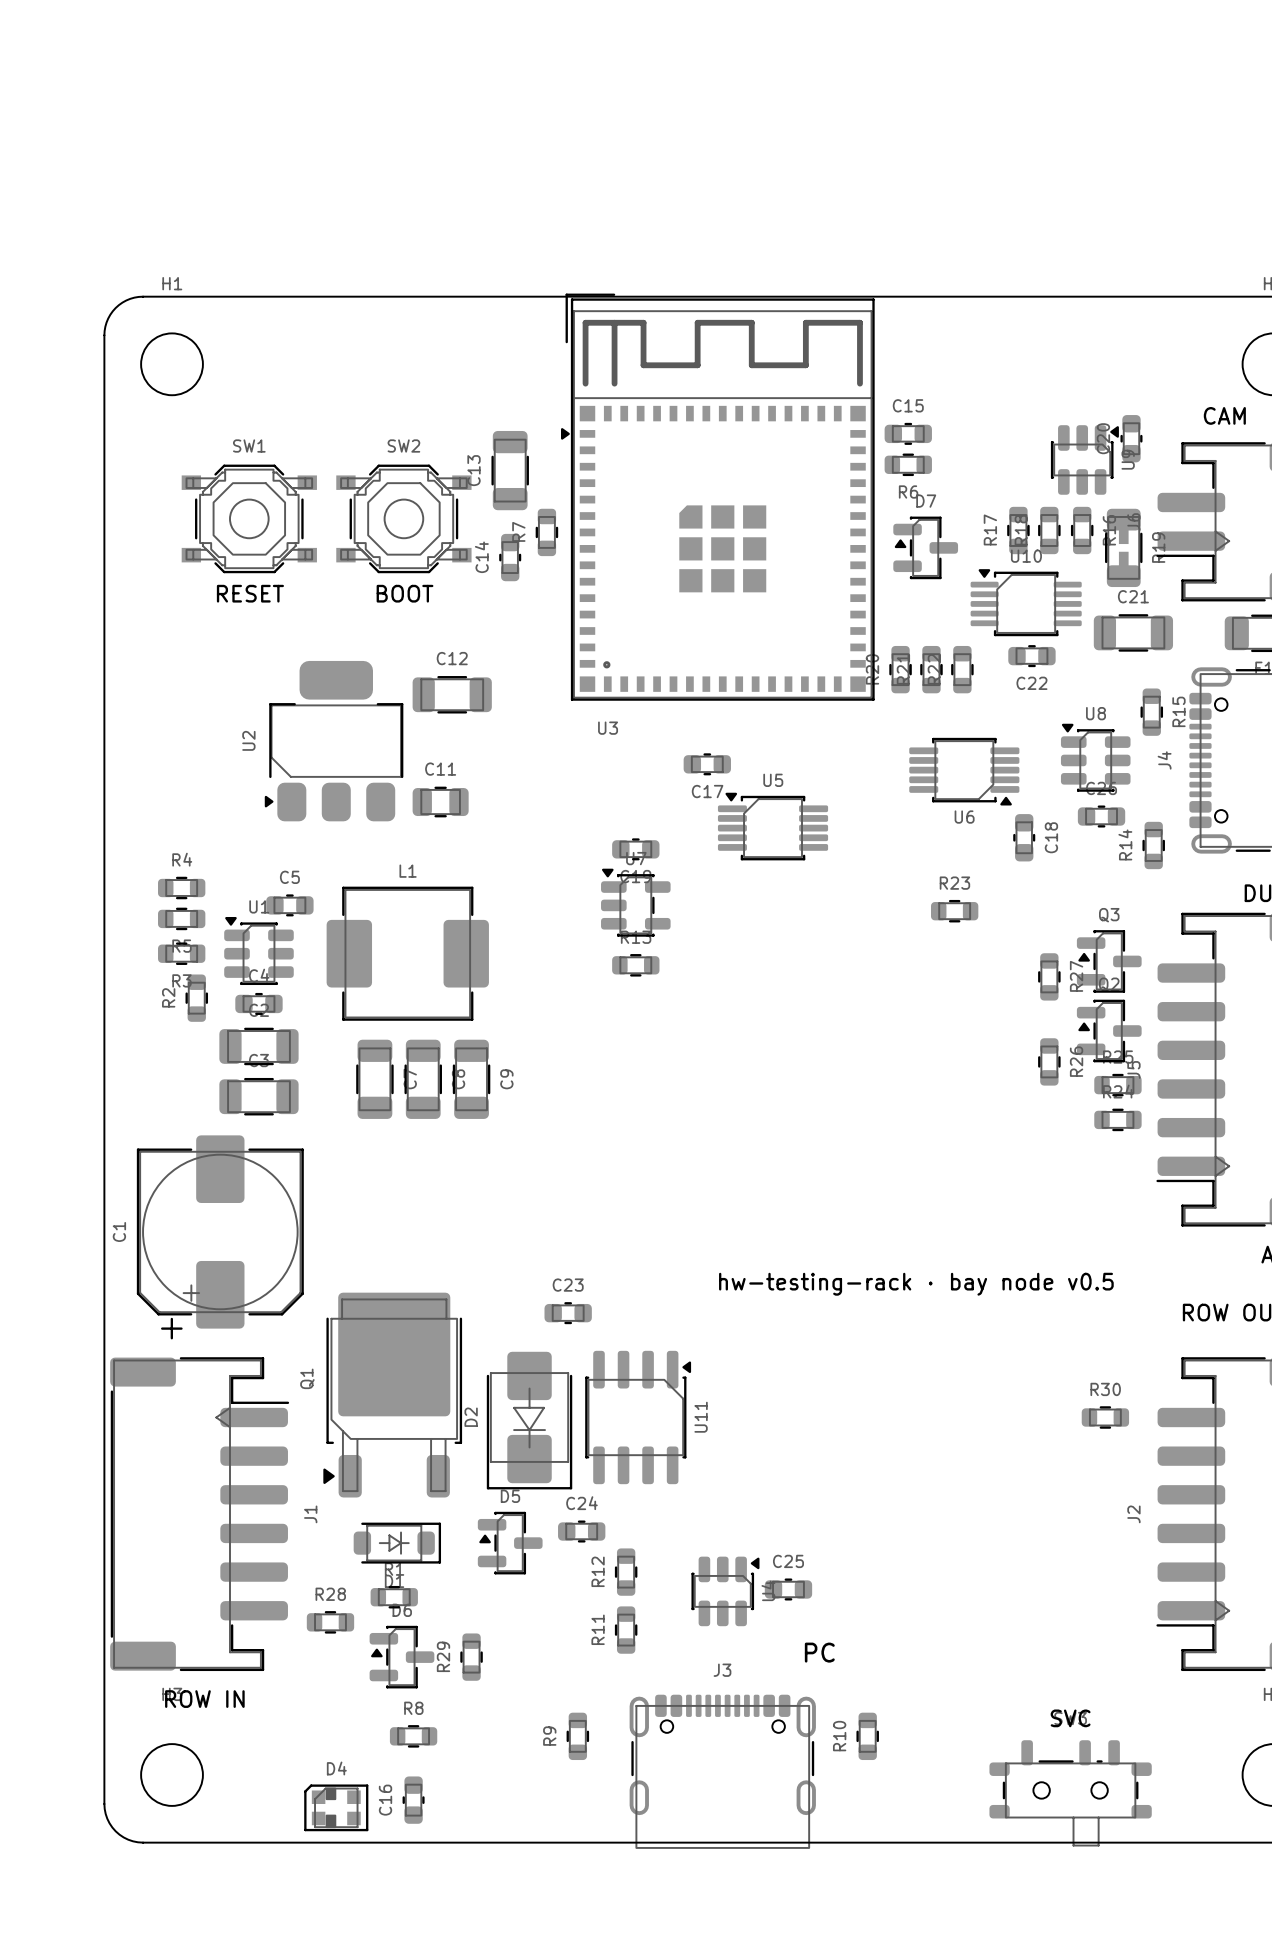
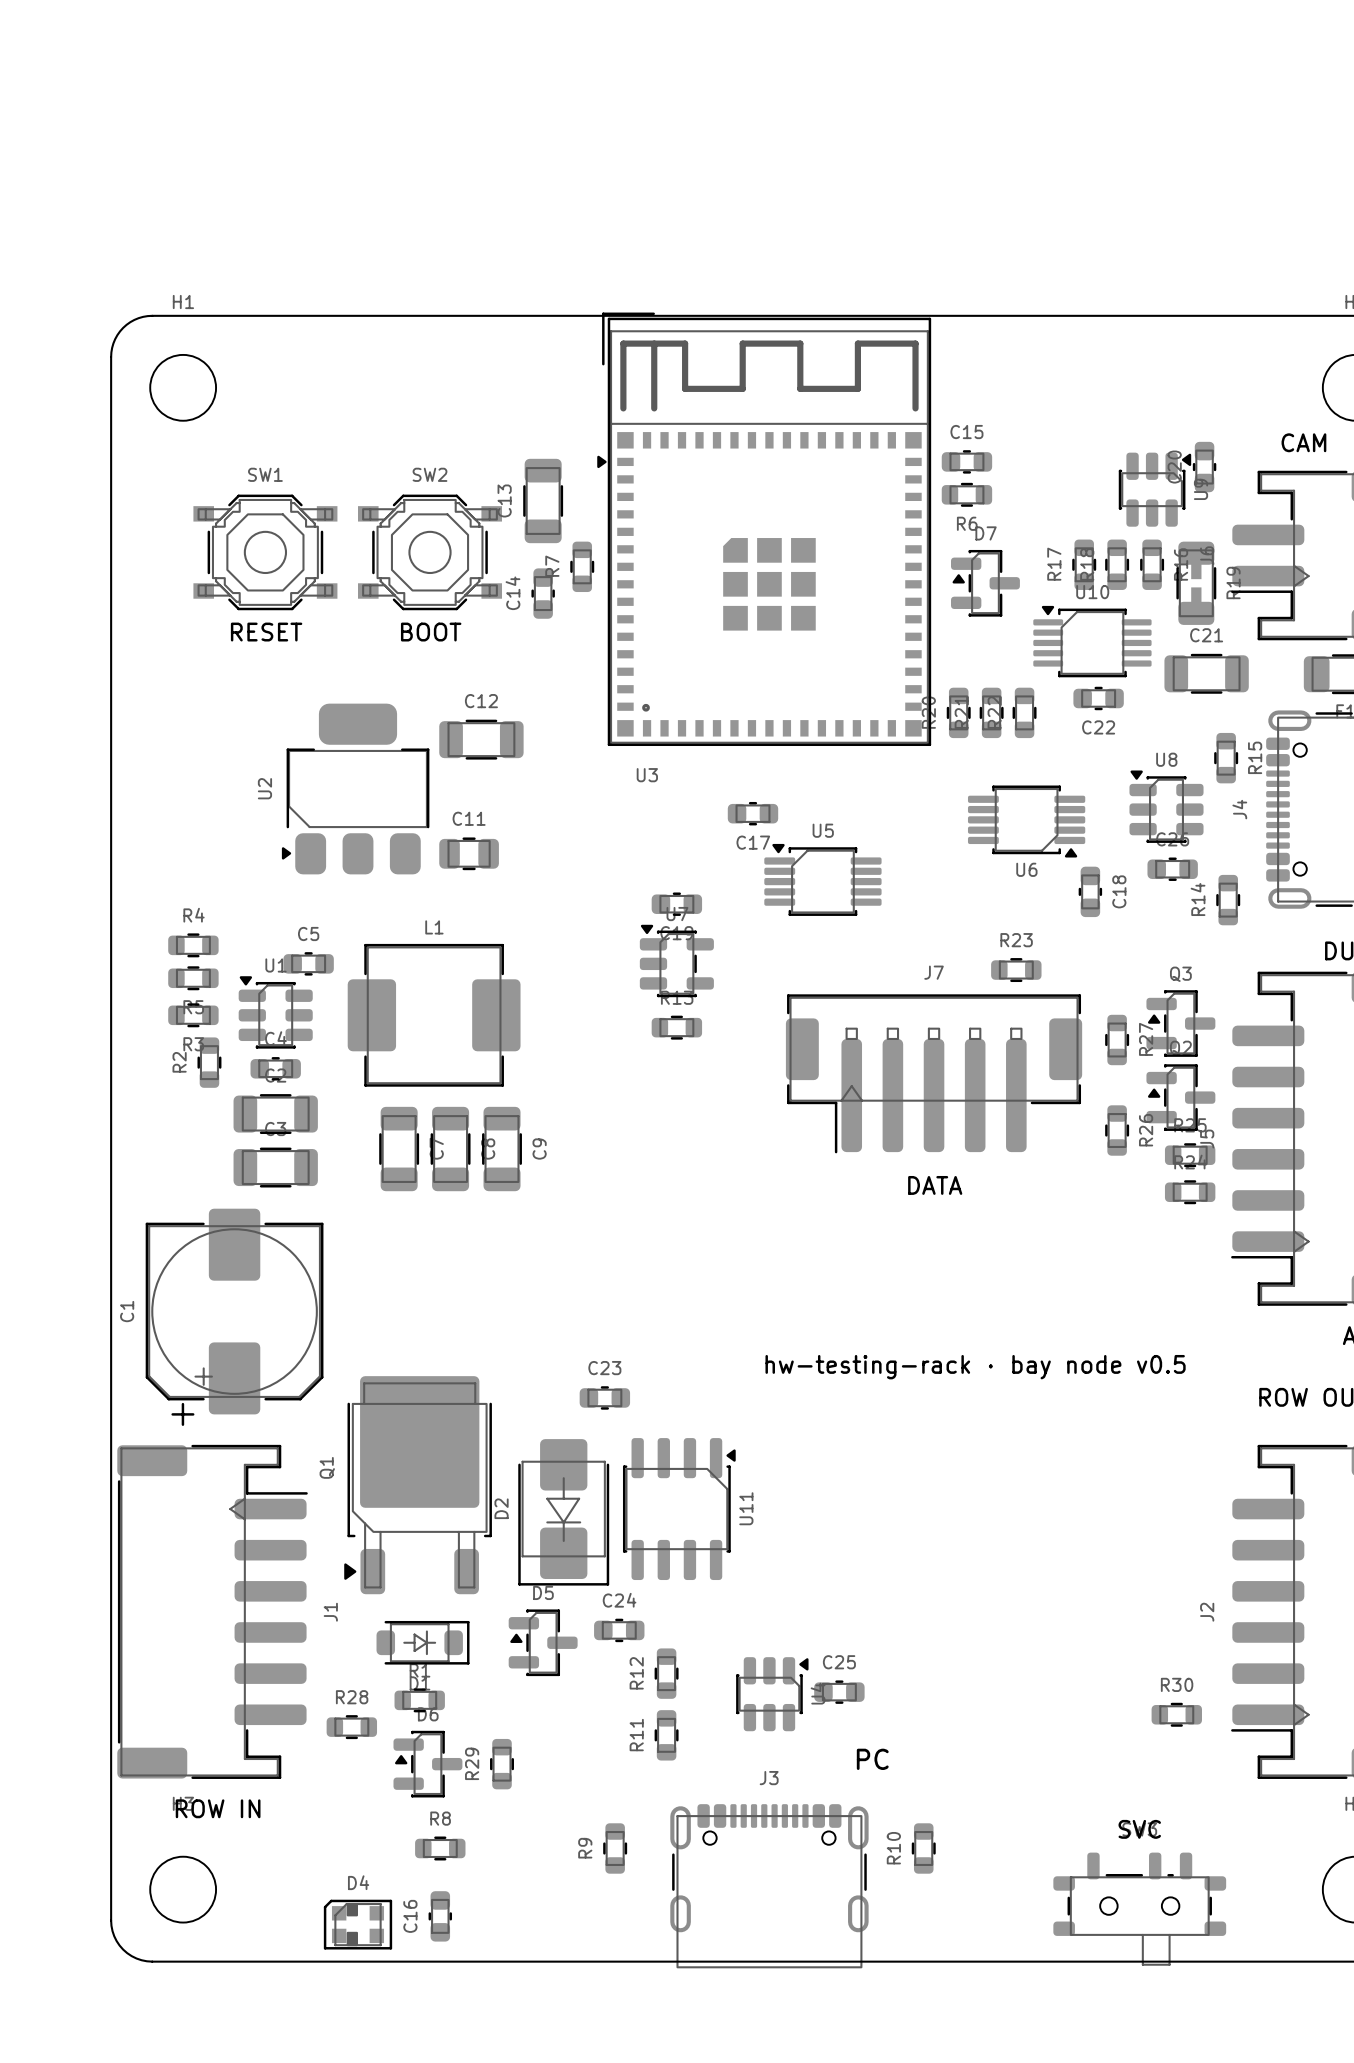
J7: none -> (934, 1073)
text: none -> DATA (935, 1185)
R30 position: (1105, 1417) -> (1176, 1714)

